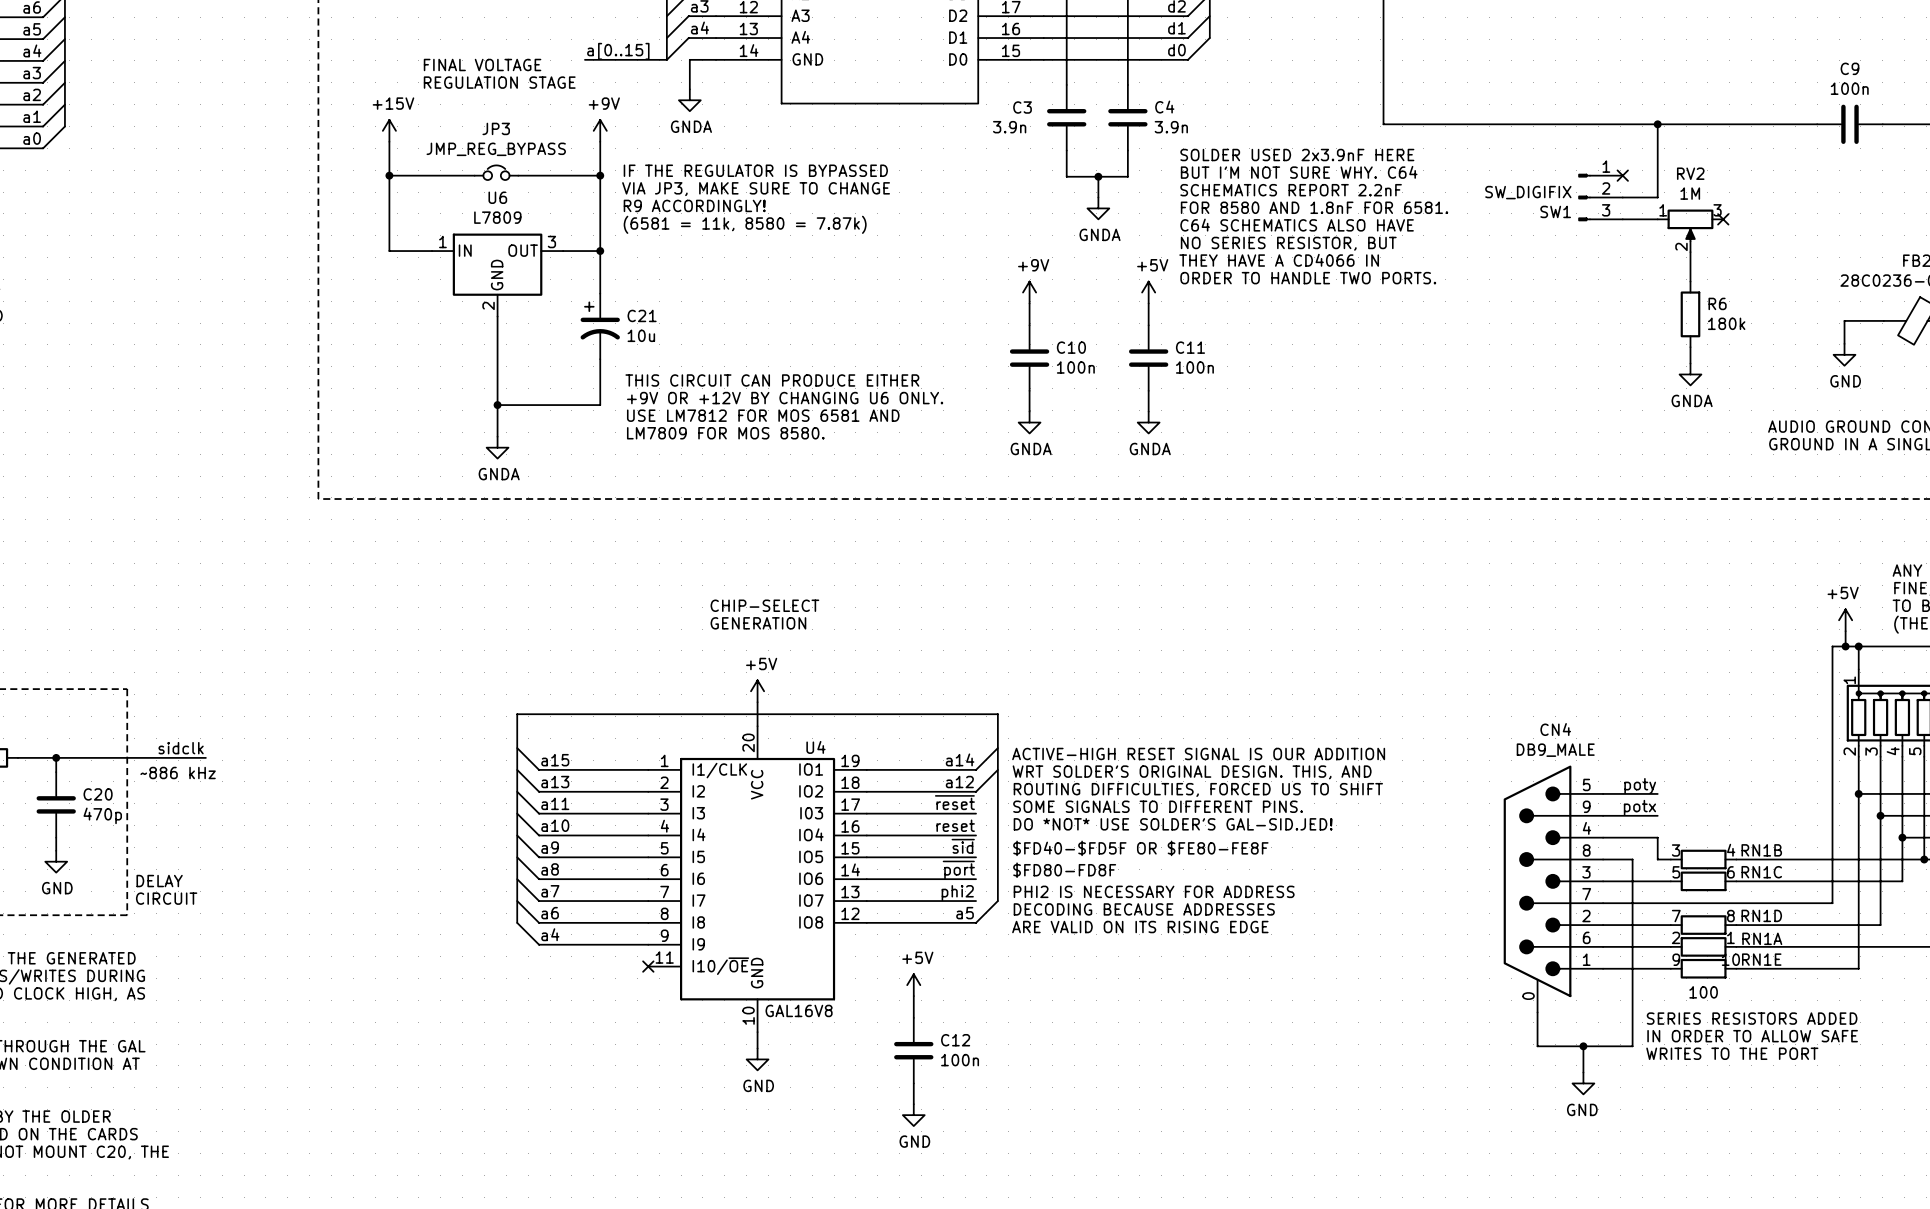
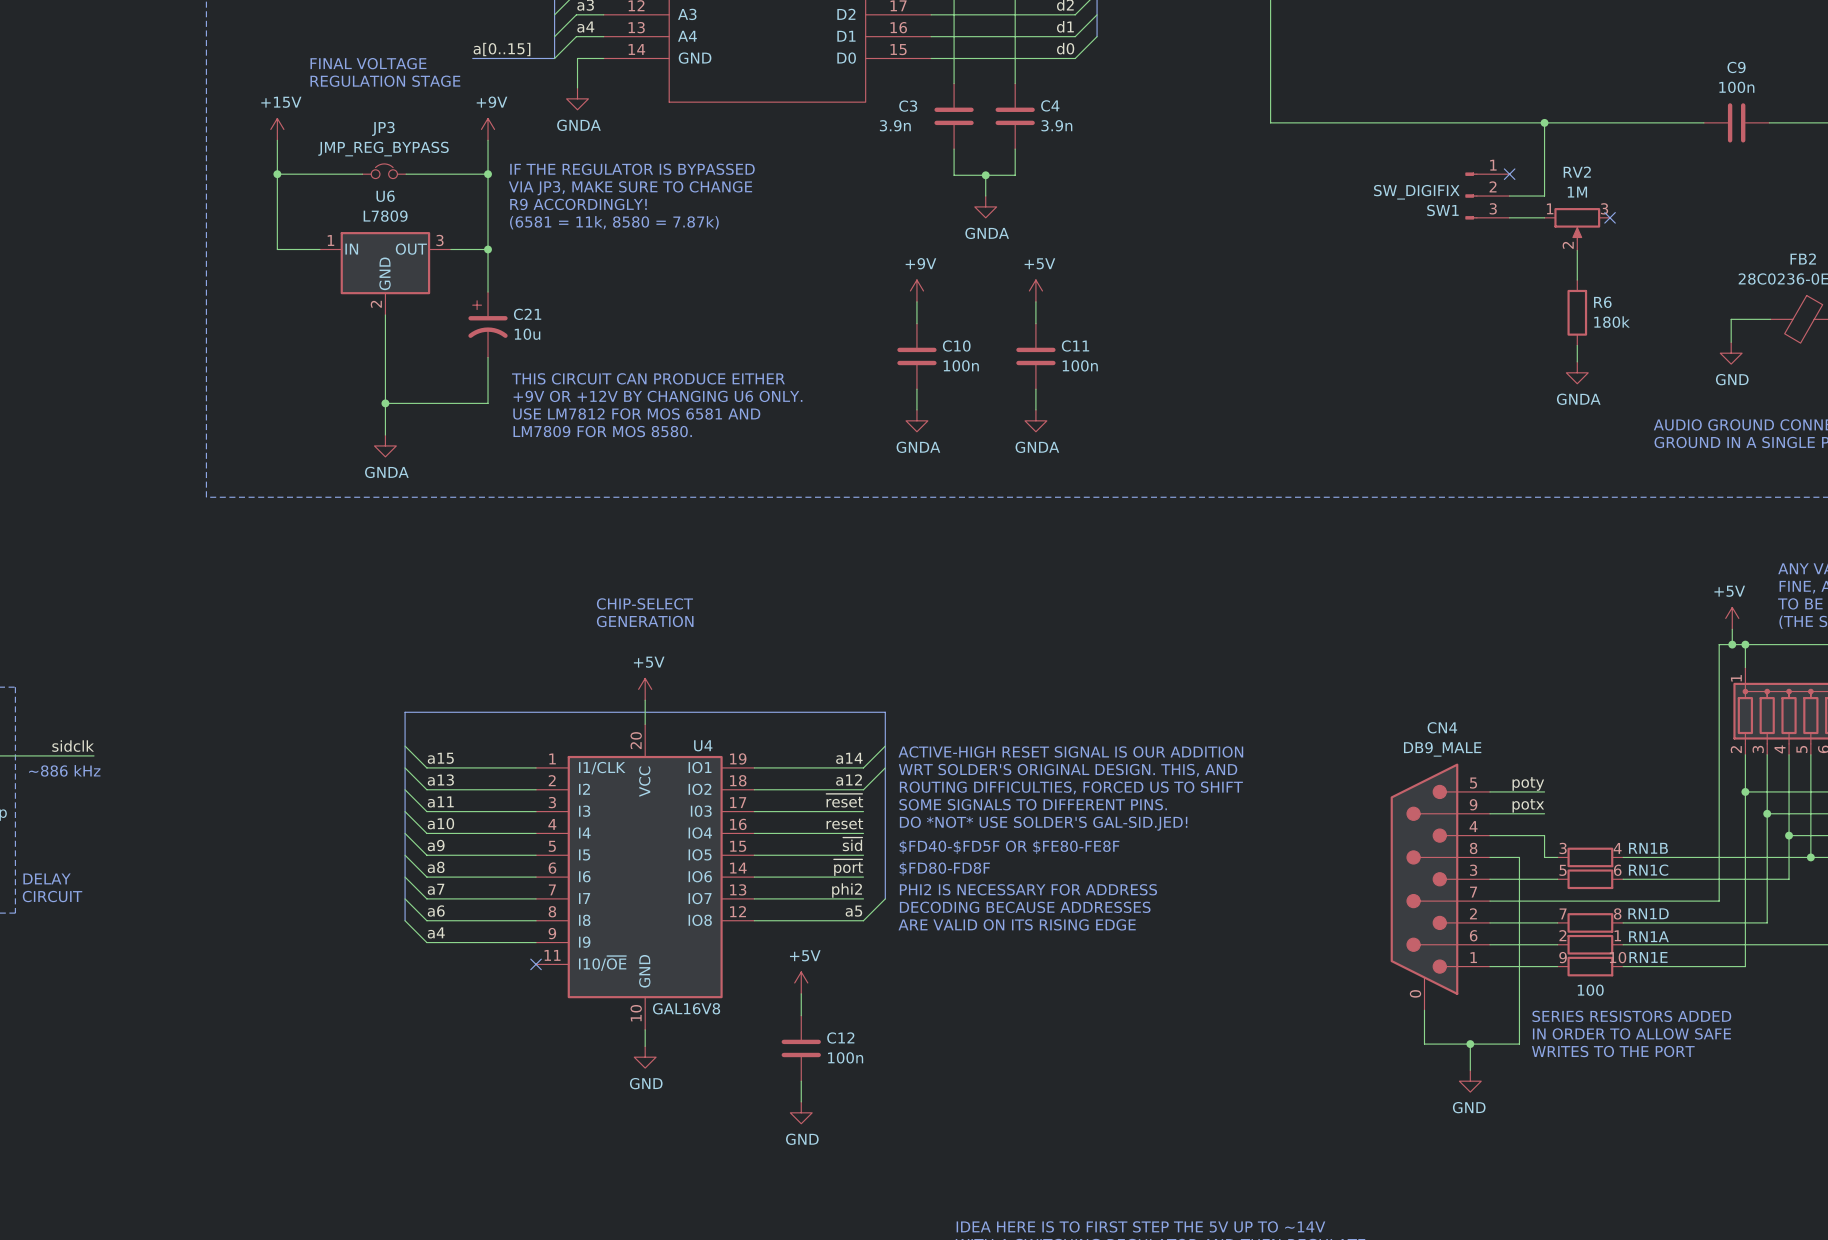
text: SOLDER USED 2x3.9nF HERE (1297, 155) -> none
text: BUT I'M NOT SURE WHY. C64 (1299, 172) -> none
text: SCHEMATICS REPORT 2.2nF (1291, 190) -> none
text: FOR 8580 AND 1.8nF FOR 6581. (1314, 207) -> none
text: C64 SCHEMATICS ALSO HAVE (1297, 225) -> none
text: NO SERIES RESISTOR, BUT (1288, 243) -> none
text: THEY HAVE A CD4066 IN (1279, 260) -> none
text: ORDER TO HANDLE TWO PORTS. (1308, 278) -> none

